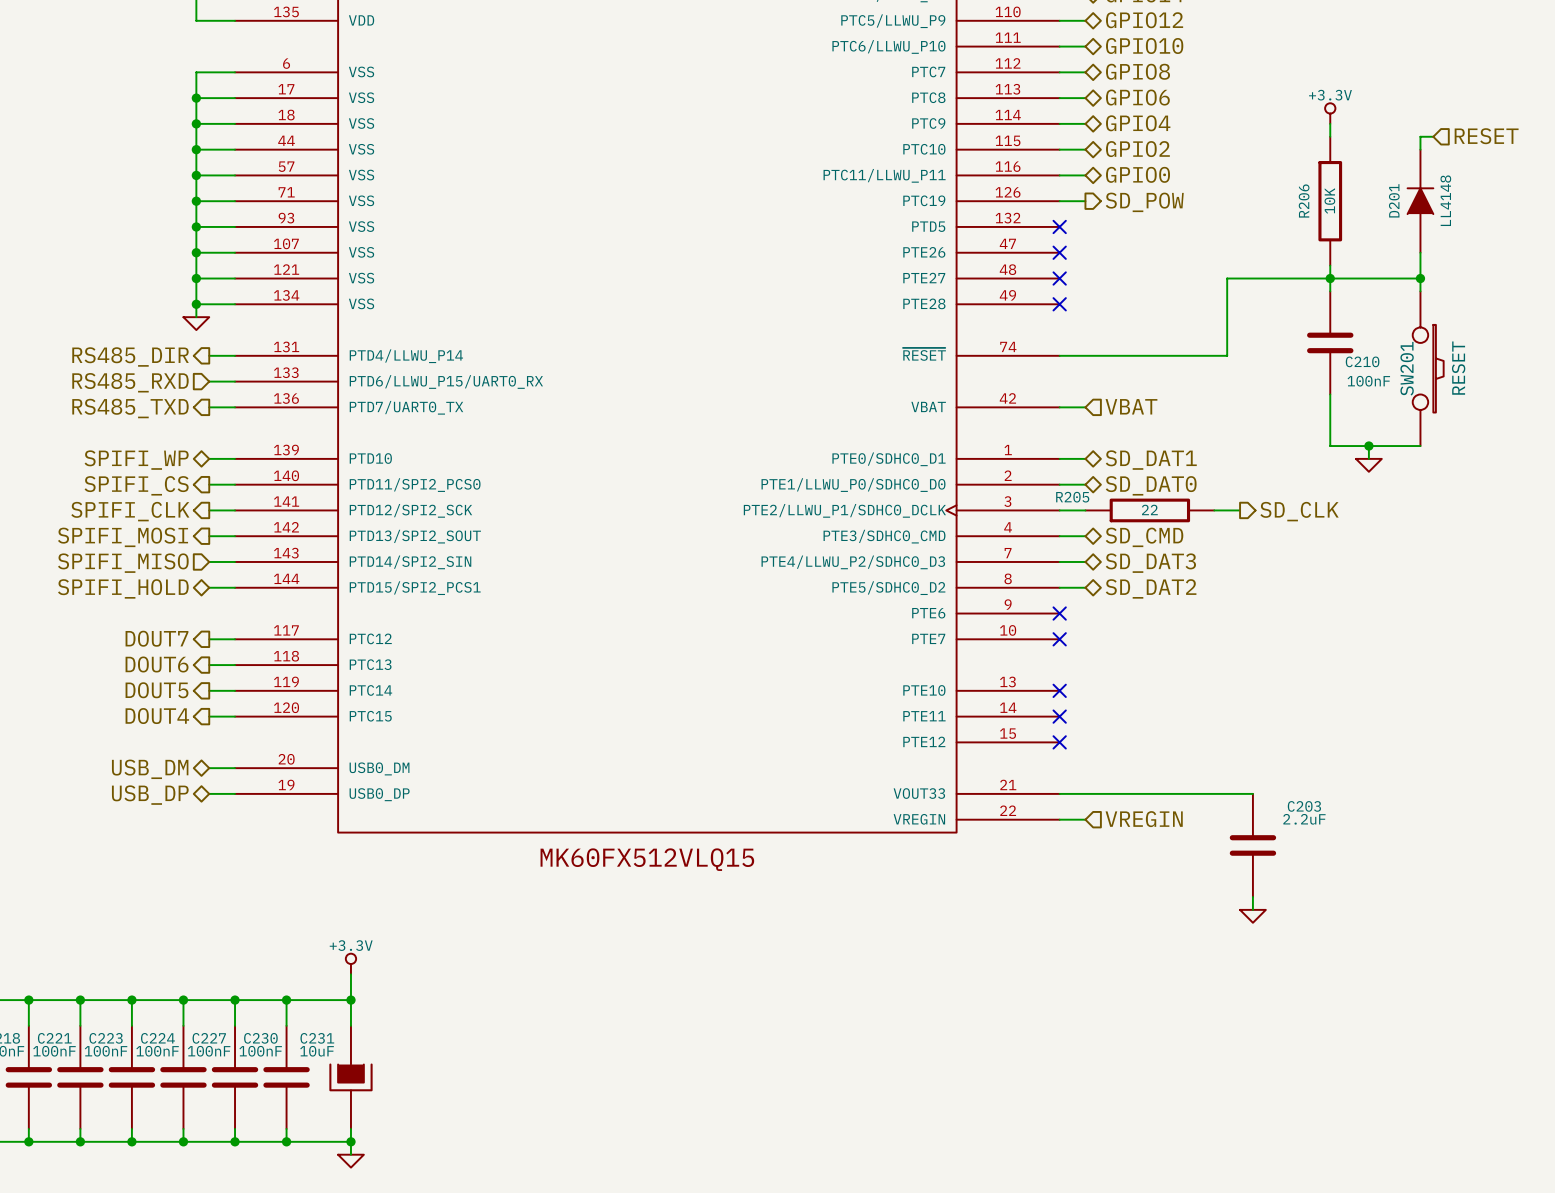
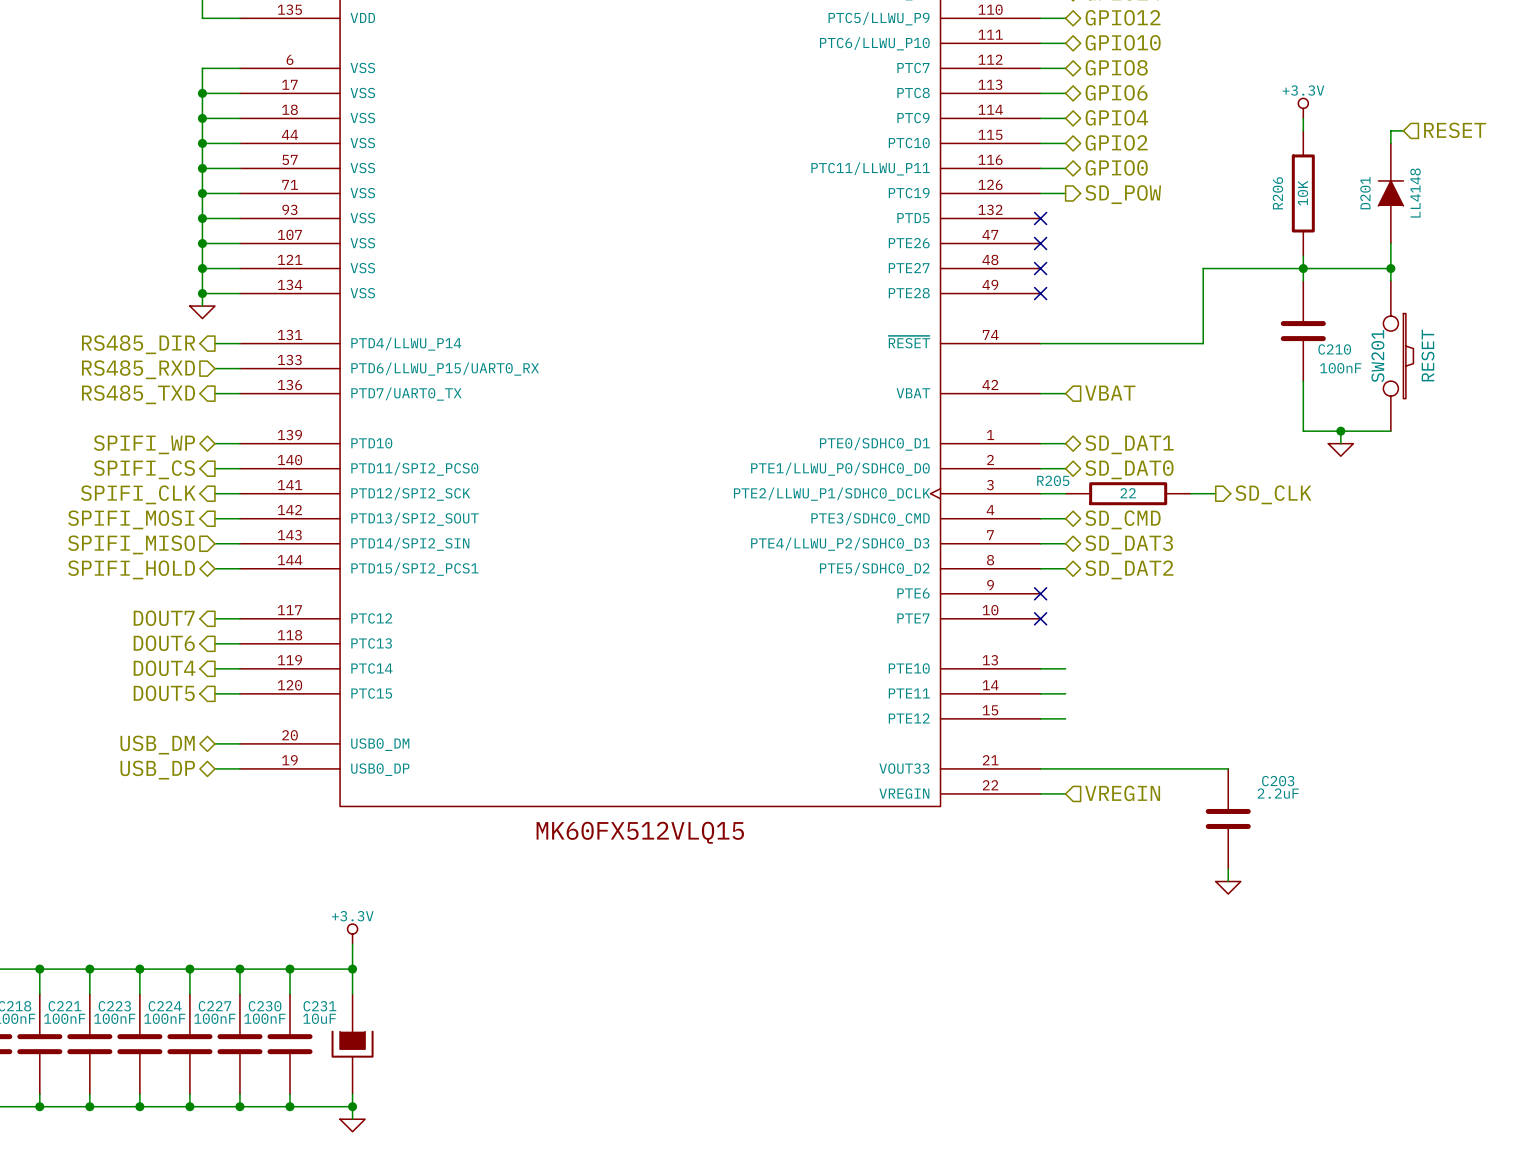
hierarchical label: DOUT5 (156, 690) -> DOUT4 (164, 668)
wire: none -> (1040, 668) (1065, 668)
no-connect mark: (1059, 690) -> none
hierarchical label: DOUT4 (157, 716) -> DOUT5 (164, 693)
wire: none -> (1040, 693) (1065, 693)
no-connect mark: (1059, 716) -> none
wire: none -> (1040, 718) (1065, 718)
no-connect mark: (1059, 742) -> none

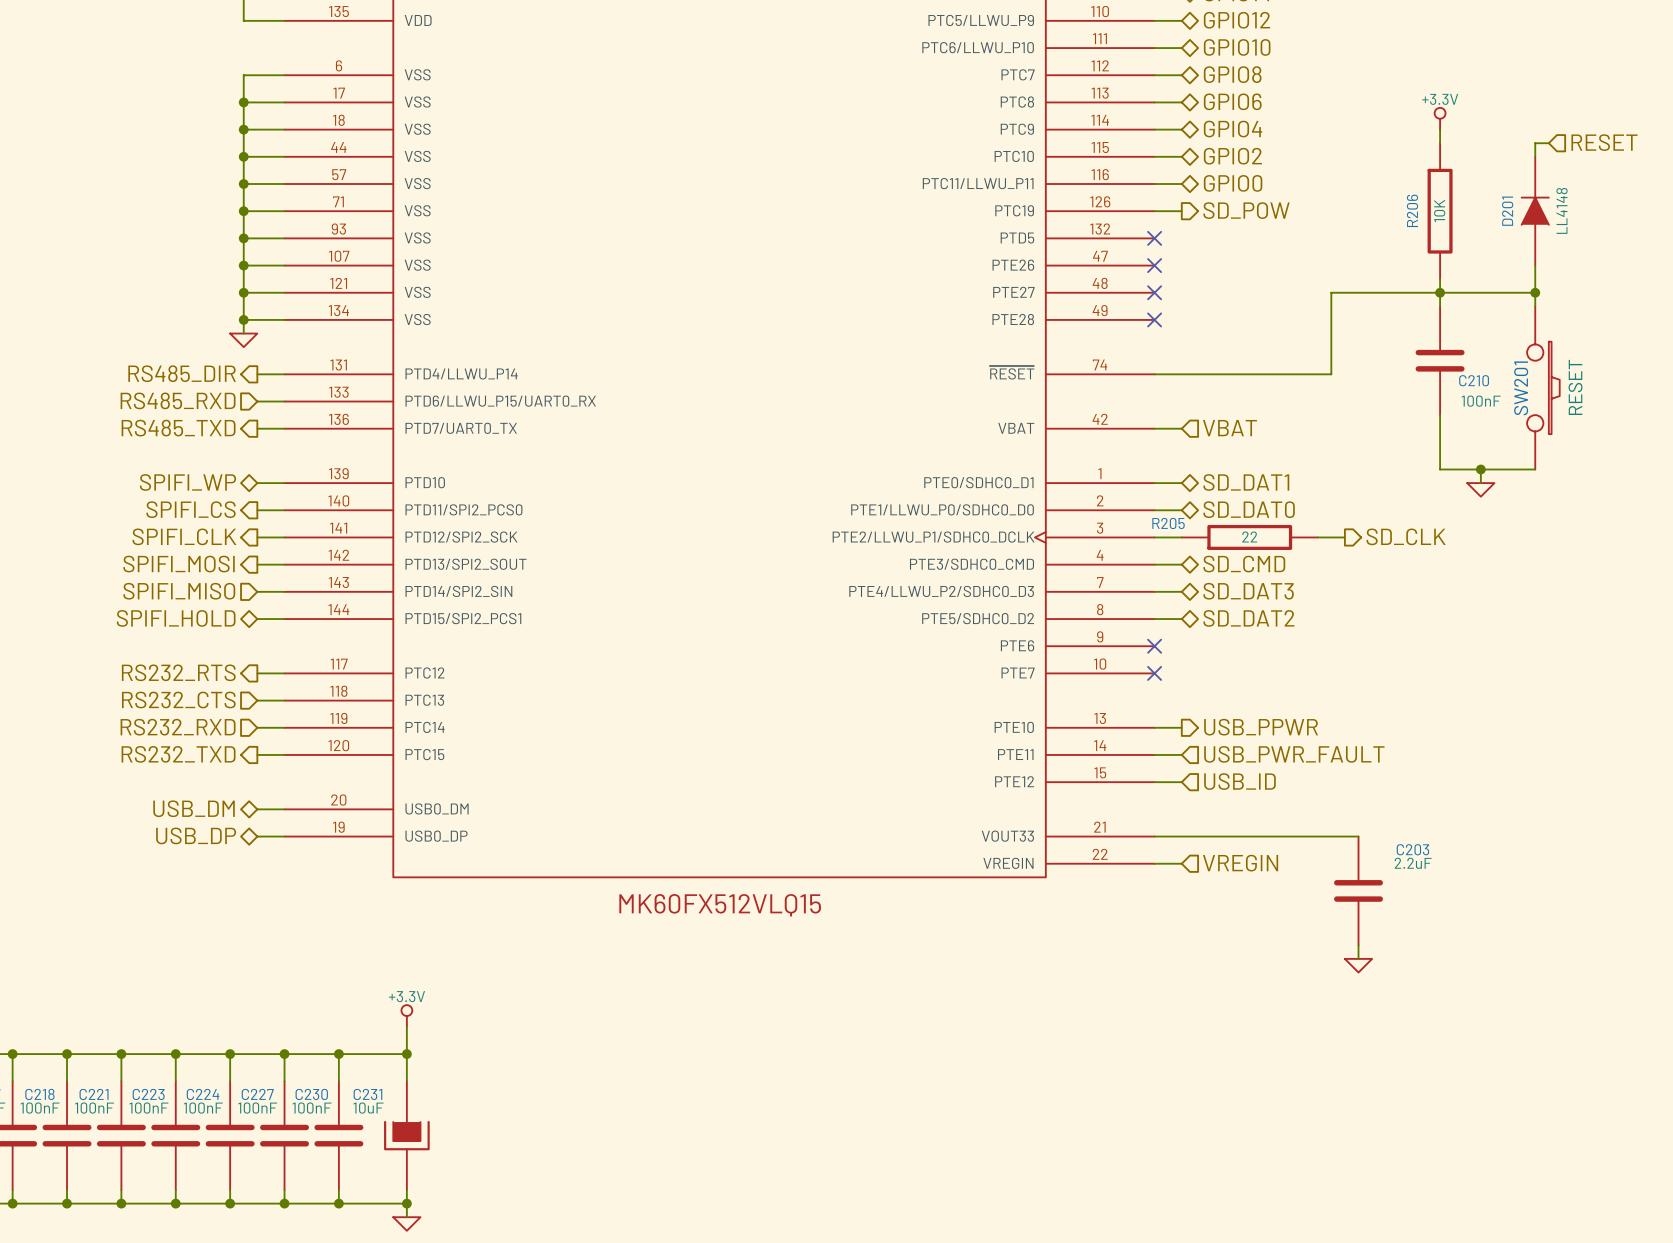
hierarchical label: DOUT7 (164, 618) -> RS232_RTS (178, 672)
hierarchical label shape: output (164, 643) -> input (178, 700)
hierarchical label: DOUT6 (164, 643) -> RS232_CTS (178, 700)
hierarchical label shape: output (164, 668) -> input (178, 727)
hierarchical label: DOUT4 (164, 668) -> RS232_RXD (178, 727)
hierarchical label: none -> USB_PPWR (1261, 727)
hierarchical label: DOUT5 (164, 693) -> RS232_TXD (178, 754)
hierarchical label: none -> USB_PWR_FAULT (1294, 754)
hierarchical label: none -> USB_ID (1239, 781)

